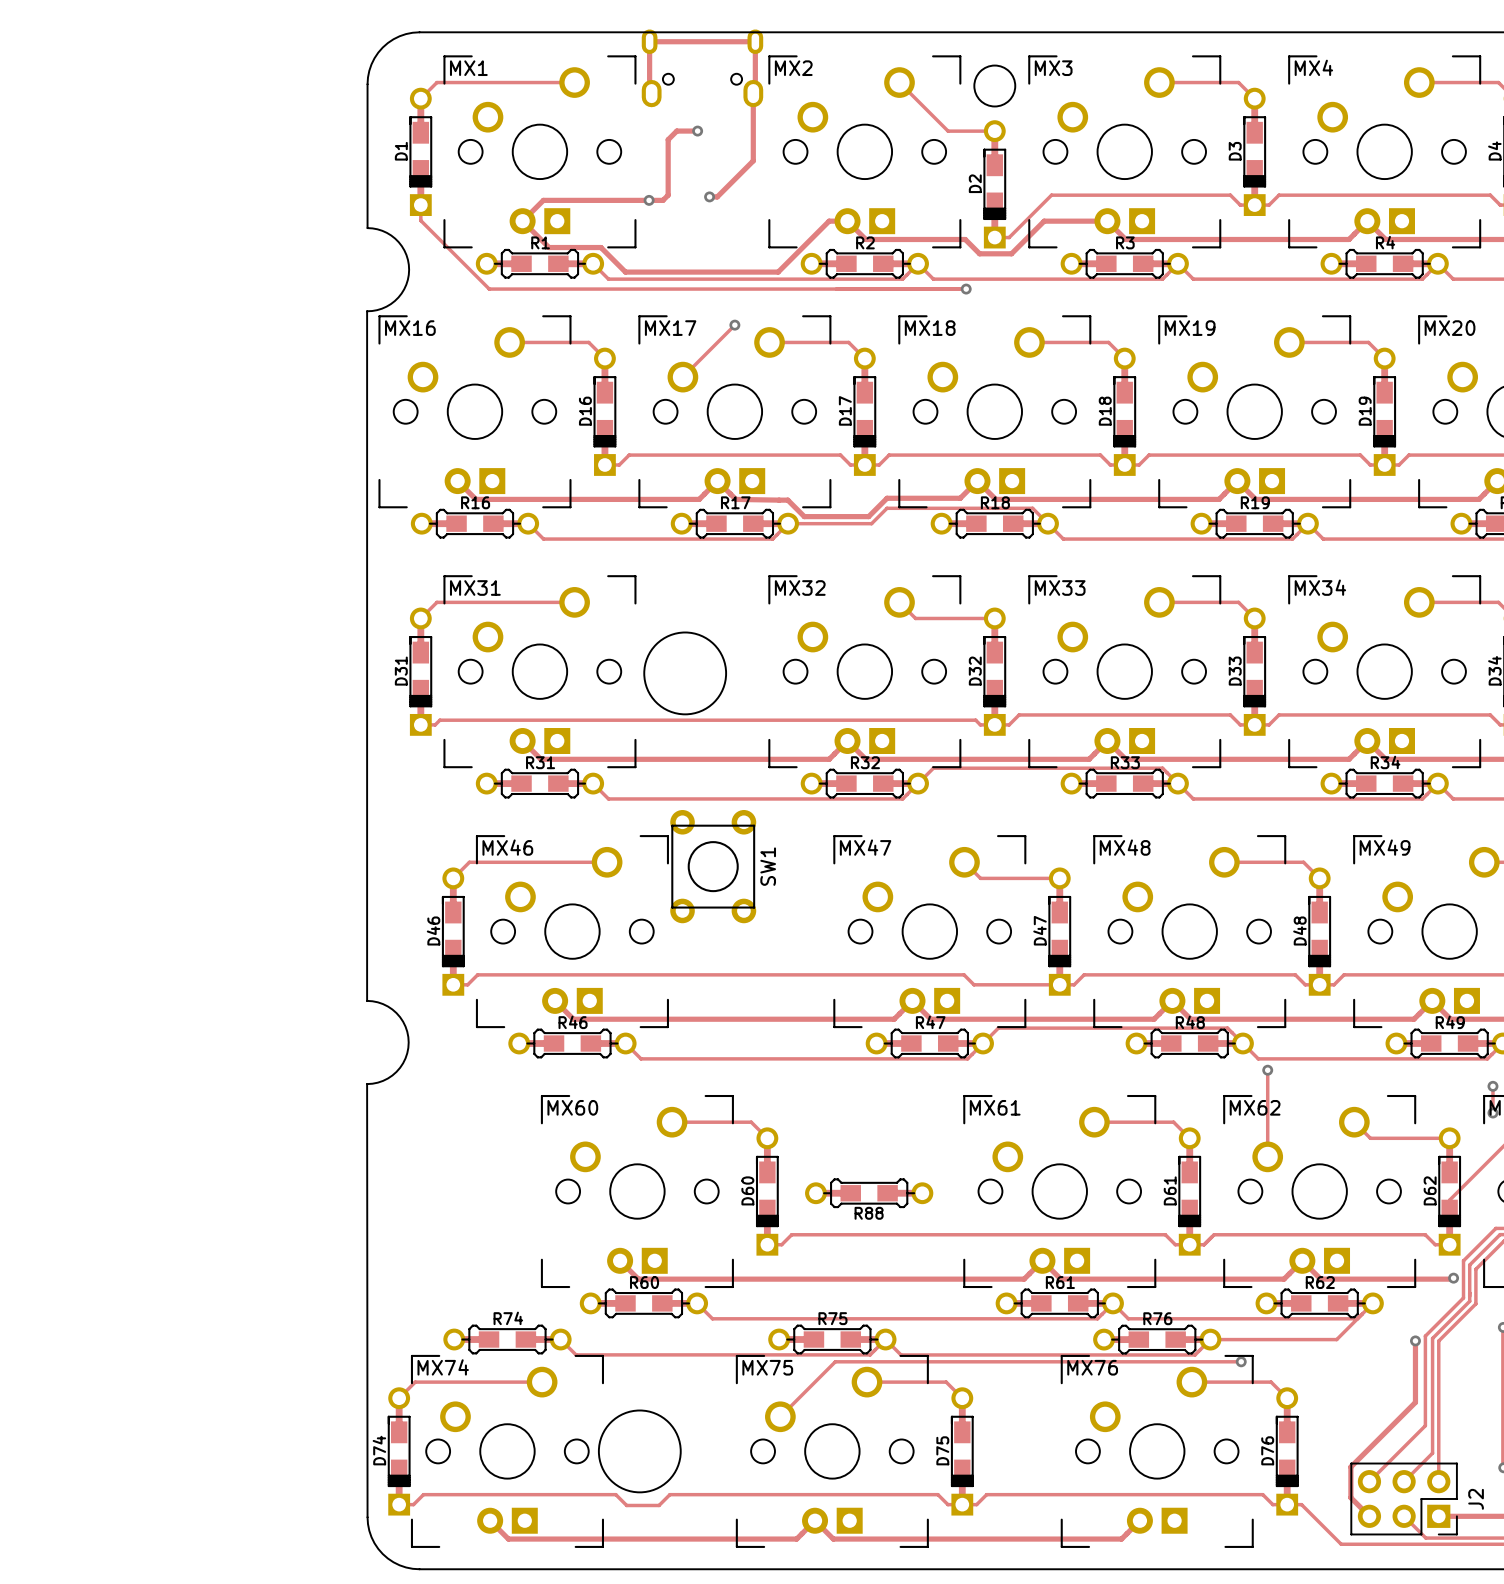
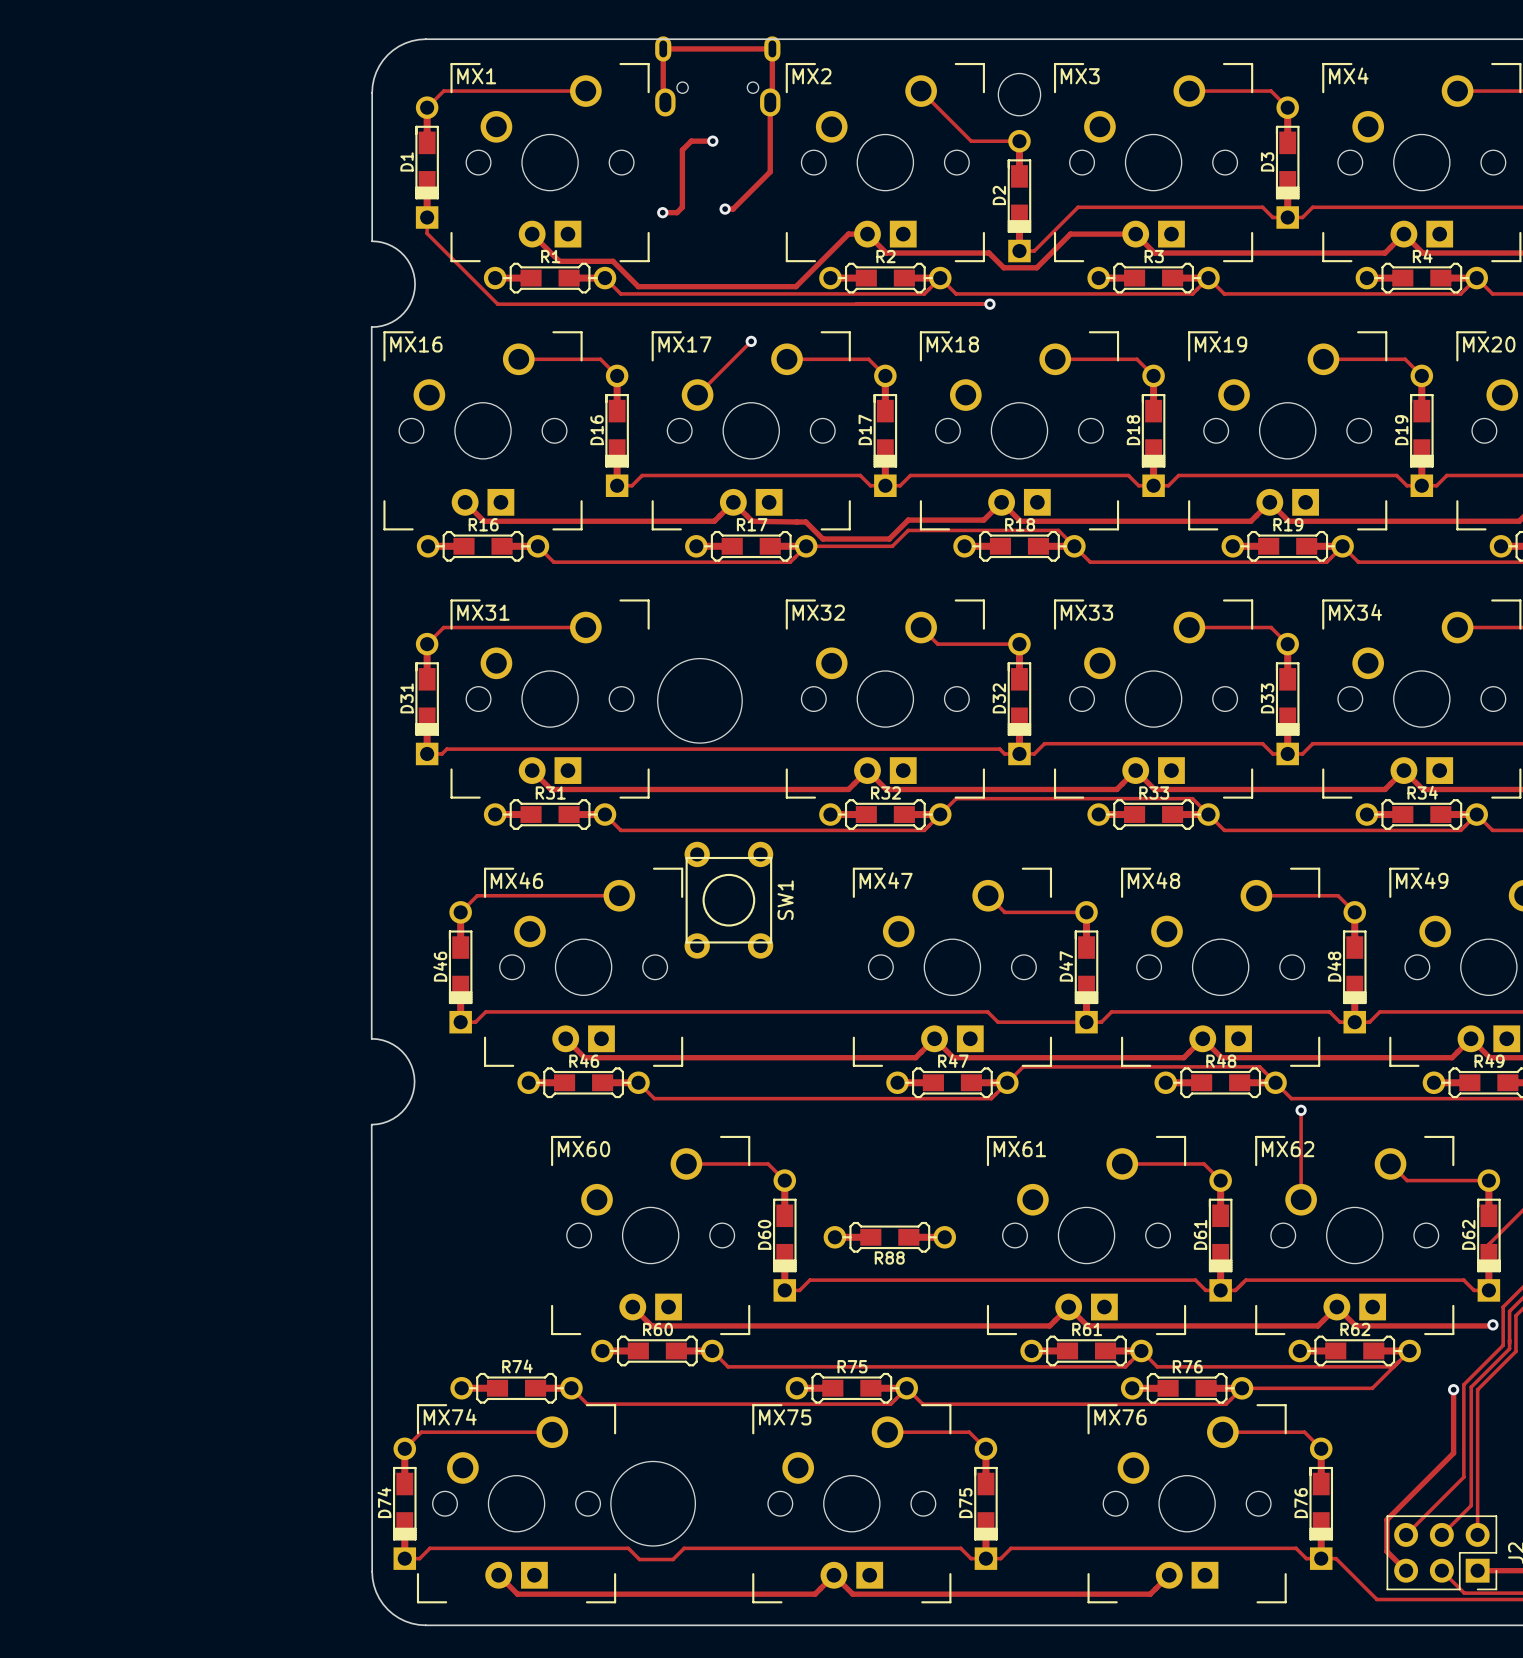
track: (649, 200) (543, 200) (522, 221) -> none
track: (1241, 1361) (835, 1361) (780, 1416) -> none
via: (1241, 1361) -> none

